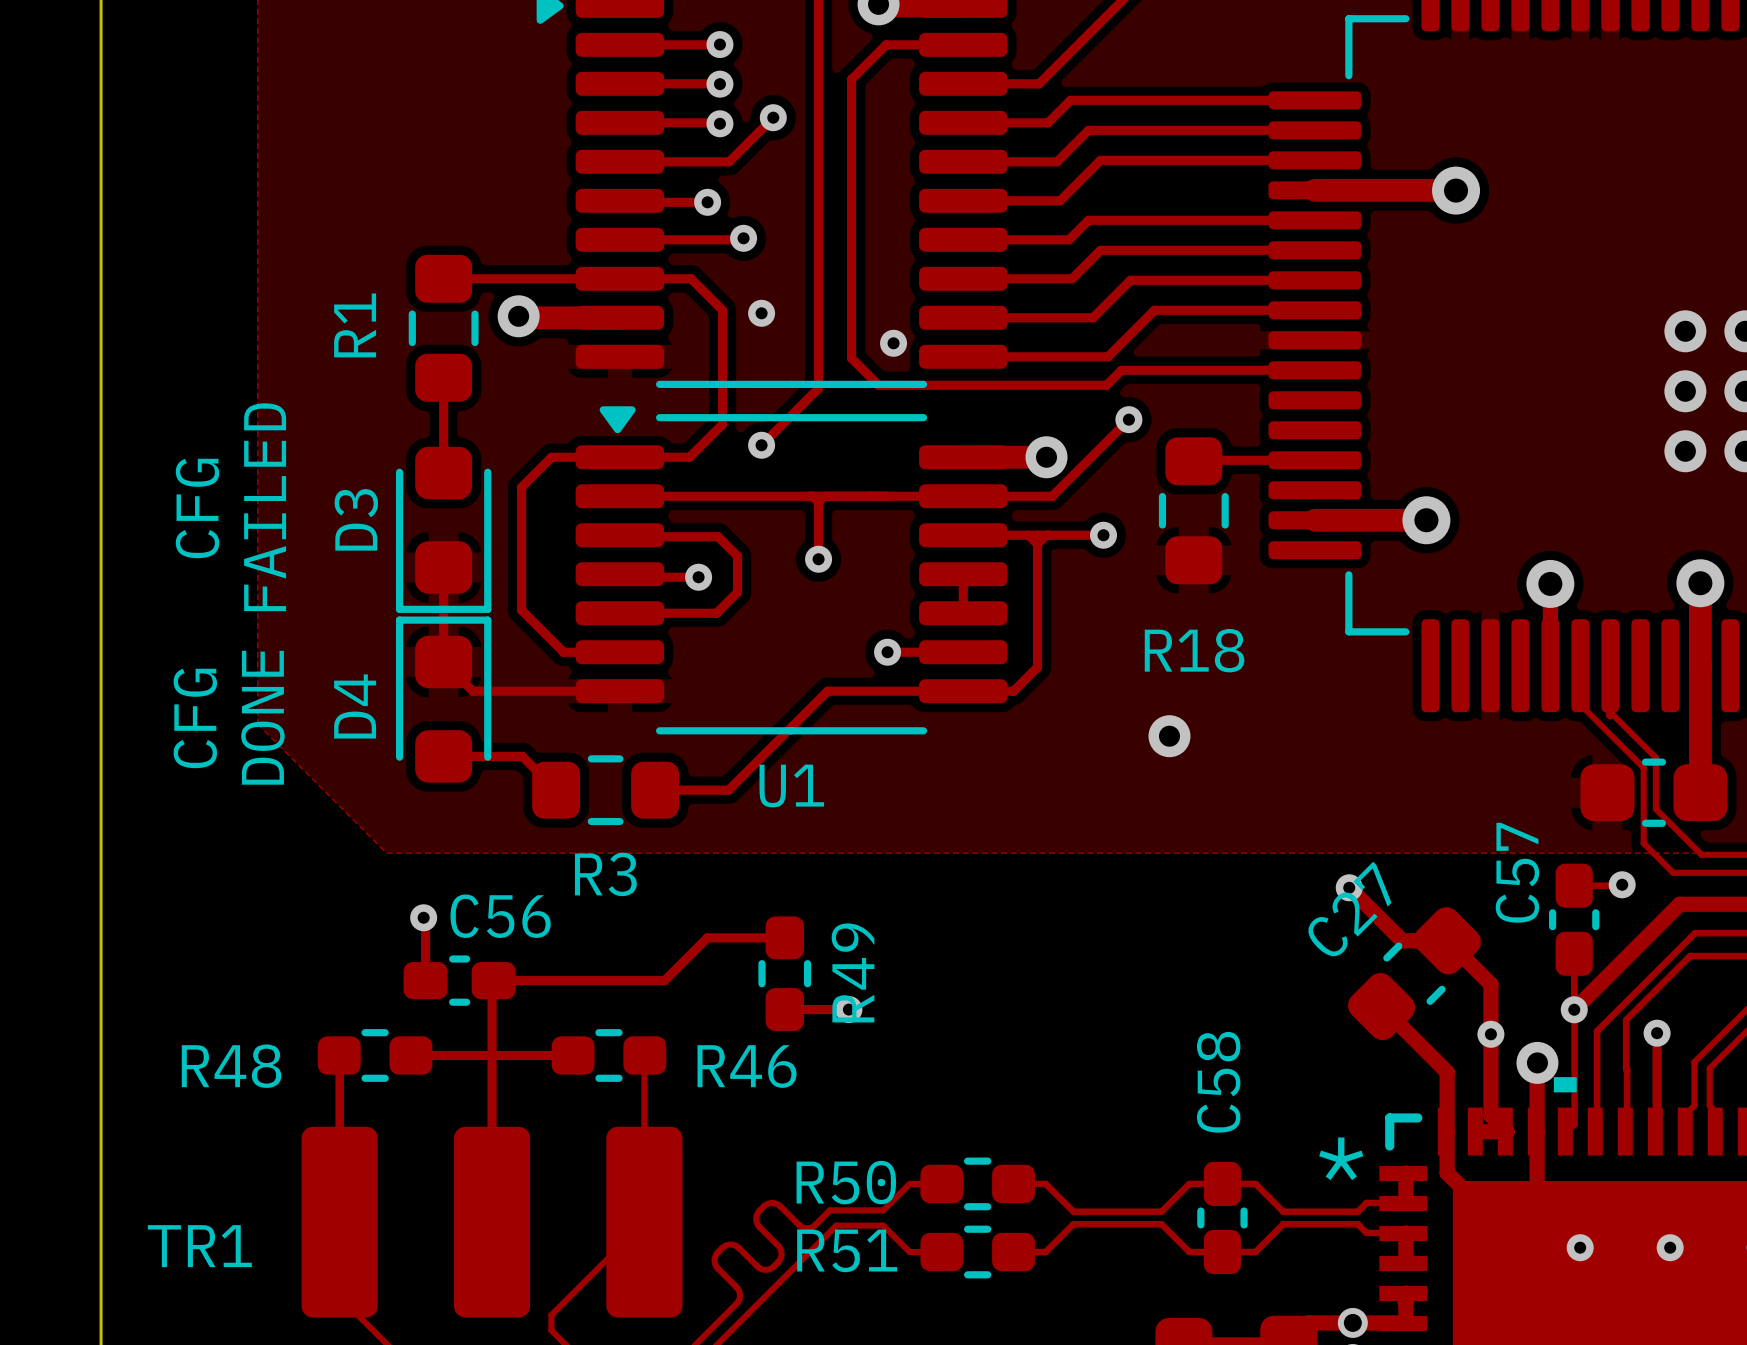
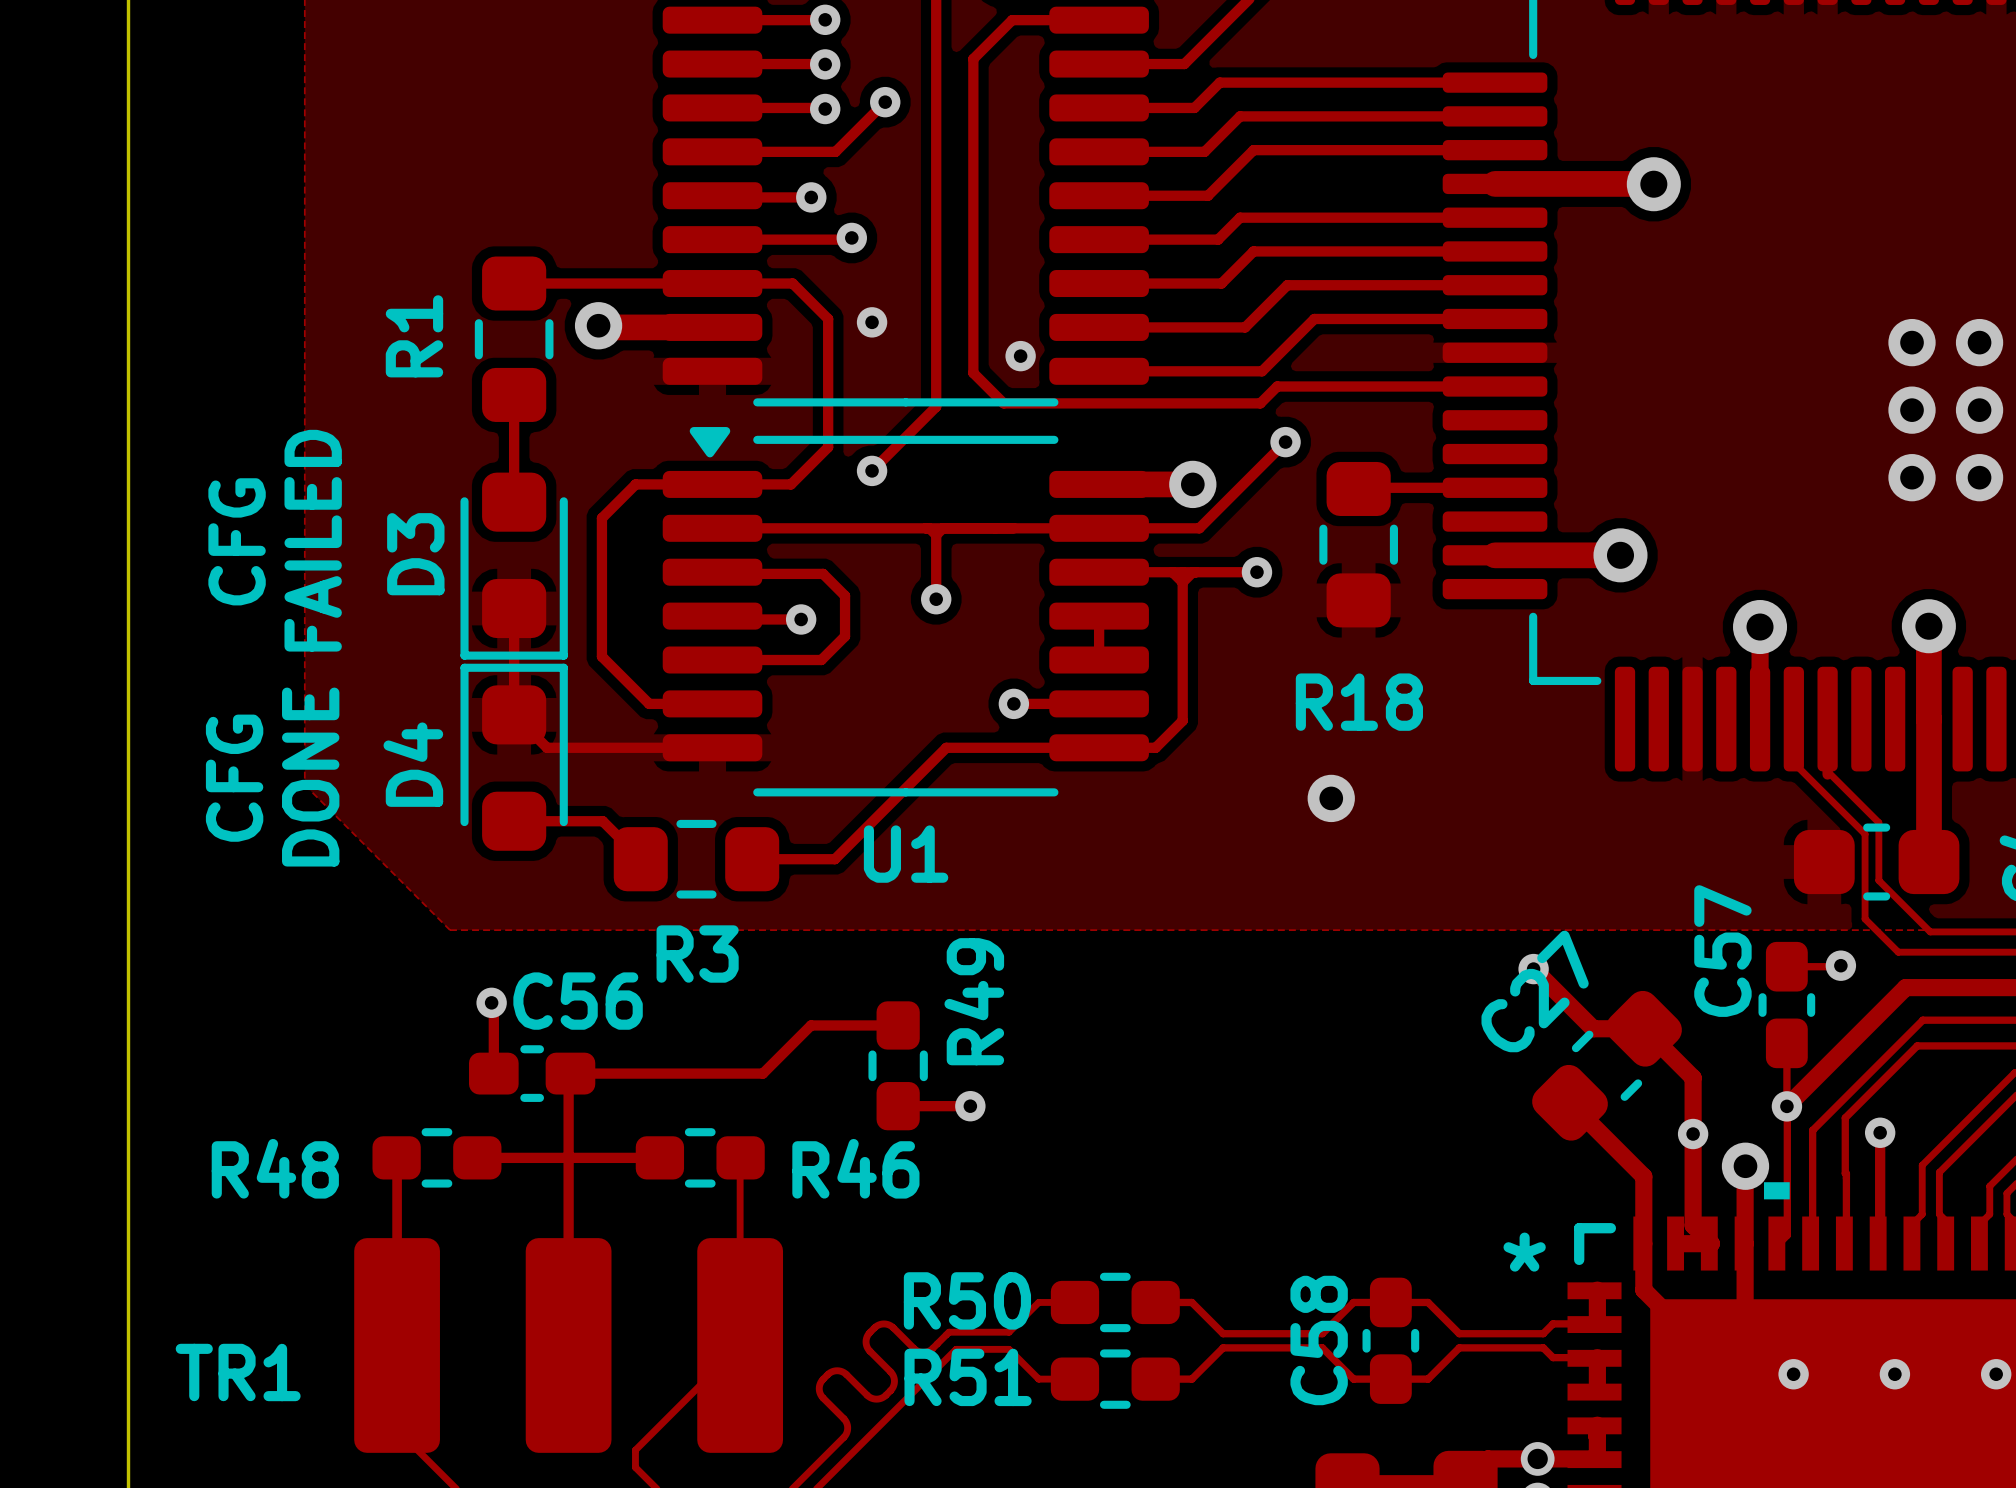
R49 name position: R49 (853, 972) -> R49 (974, 1001)
C58 name position: C58 (1218, 1082) -> C58 (1319, 1340)

